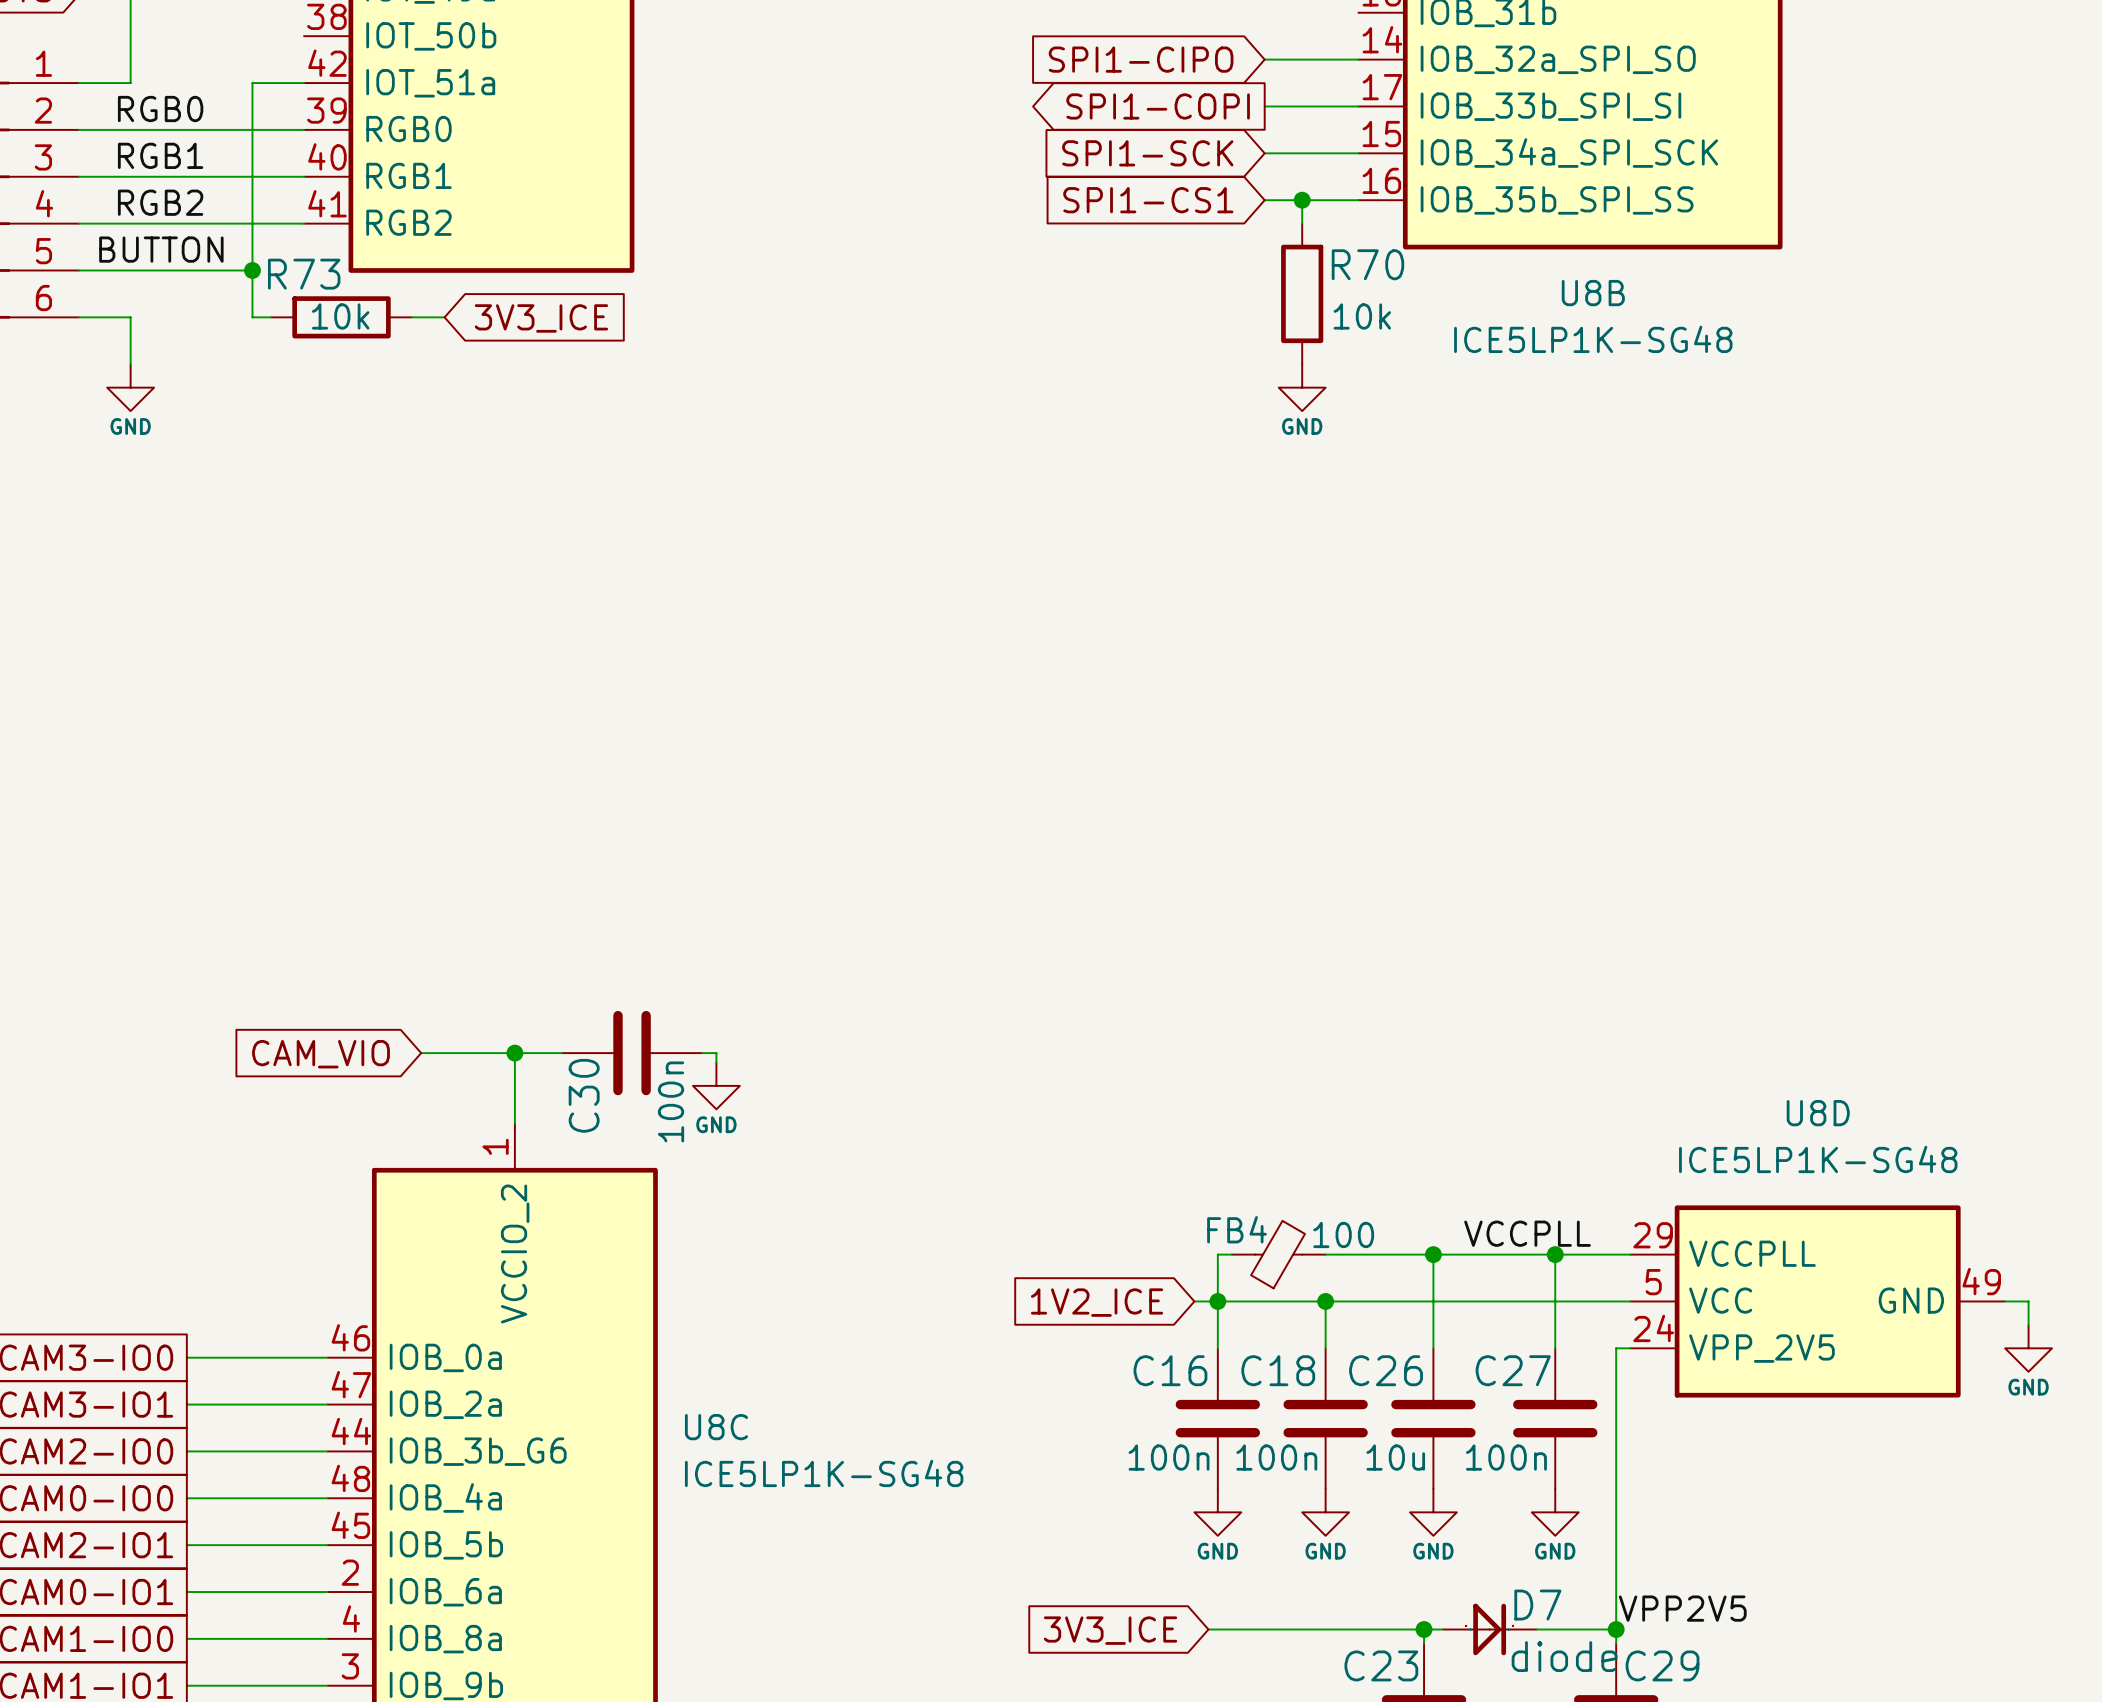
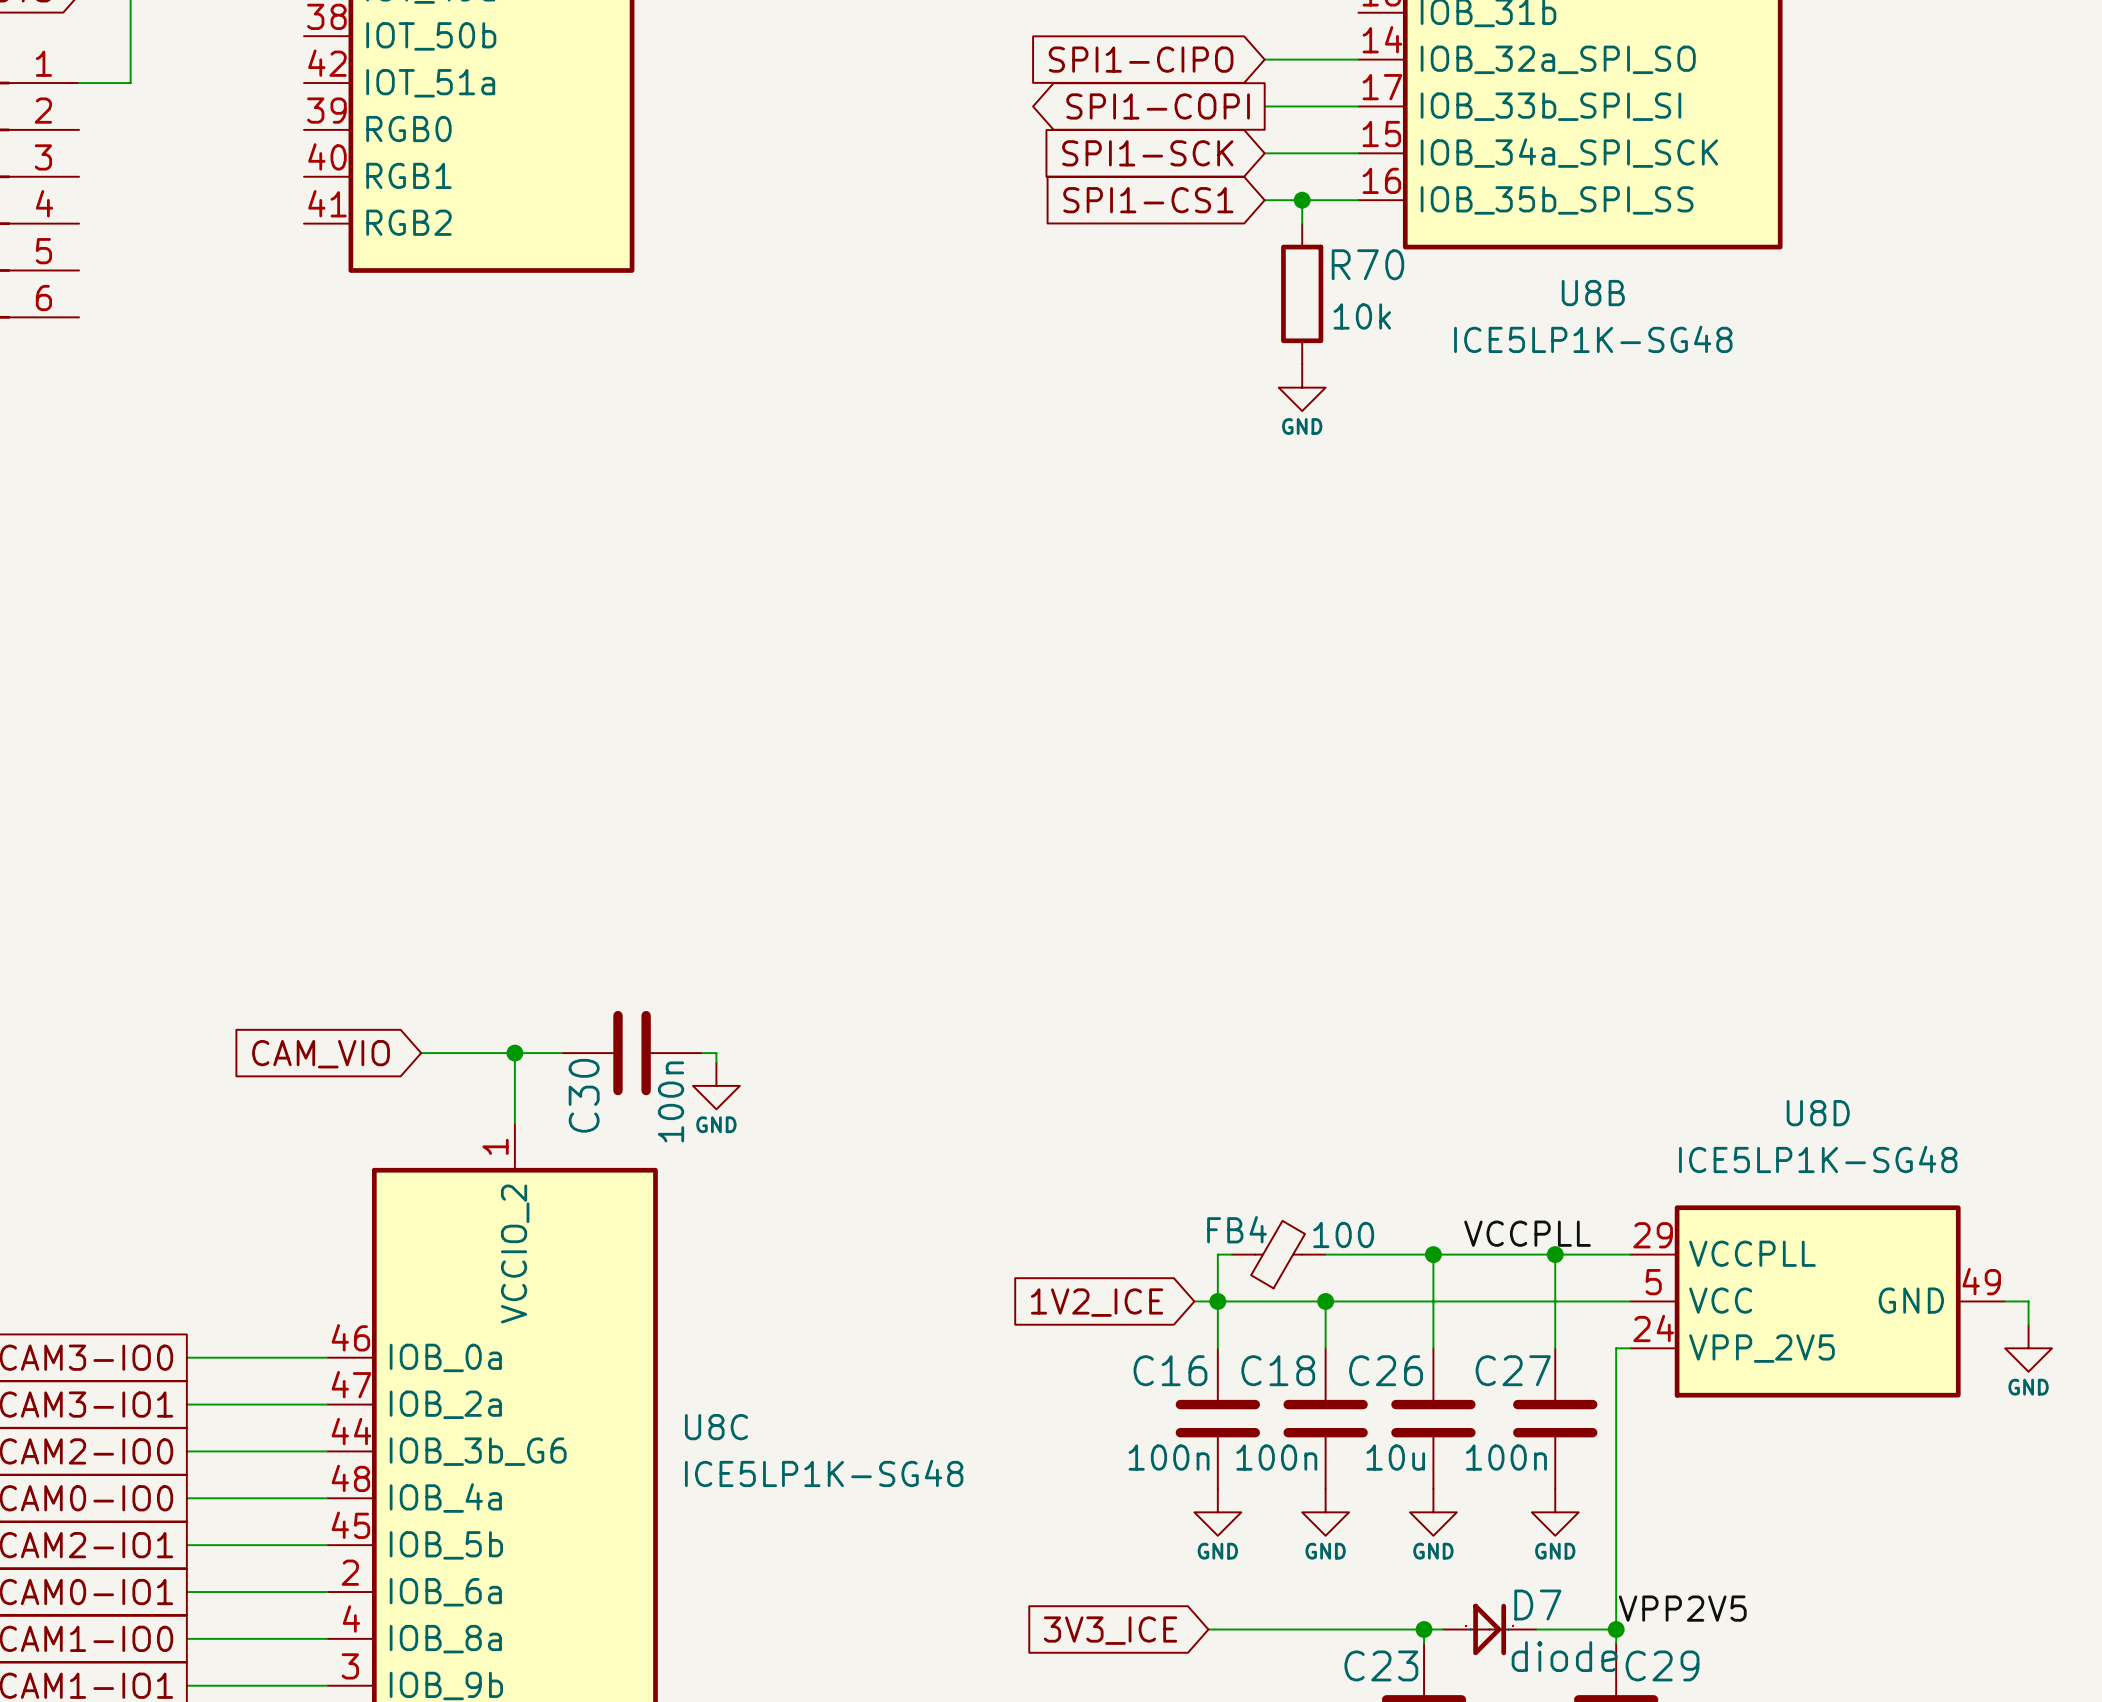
wire: (304, 83) (252, 83) (252, 317) (271, 317) -> none
label: RGB0 (160, 108) -> none
wire: (79, 129) (304, 129) -> none
label: RGB1 (160, 155) -> none
wire: (79, 176) (304, 176) -> none
label: RGB2 (160, 202) -> none
wire: (79, 223) (304, 223) -> none
label: BUTTON (161, 249) -> none
wire: (79, 270) (252, 270) -> none
junction: (252, 270) -> none
wire: (79, 317) (130, 317) (130, 364) -> none
R73: (341, 317) -> none
wire: (411, 317) (444, 317) -> none
global label: 3V3_ICE (541, 318) -> none
power symbol: GND (130, 387) -> none

